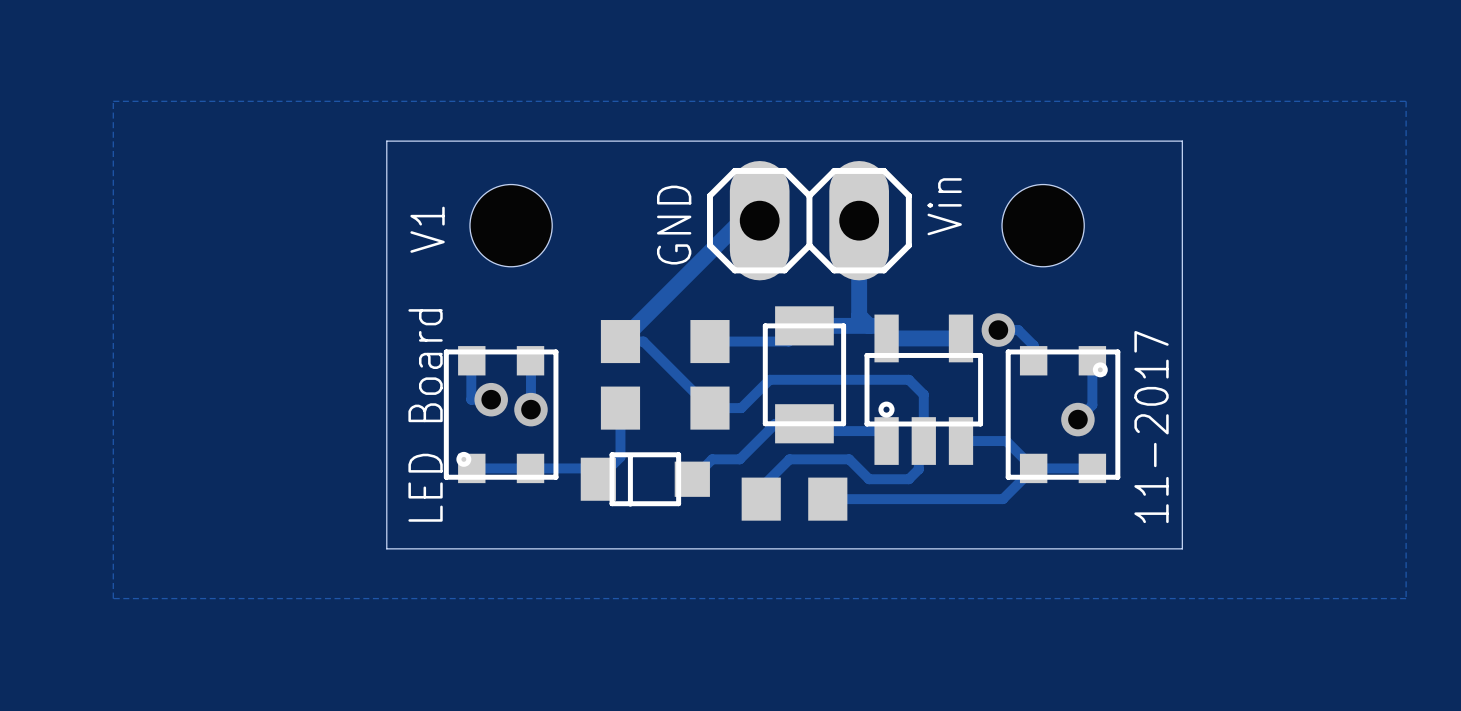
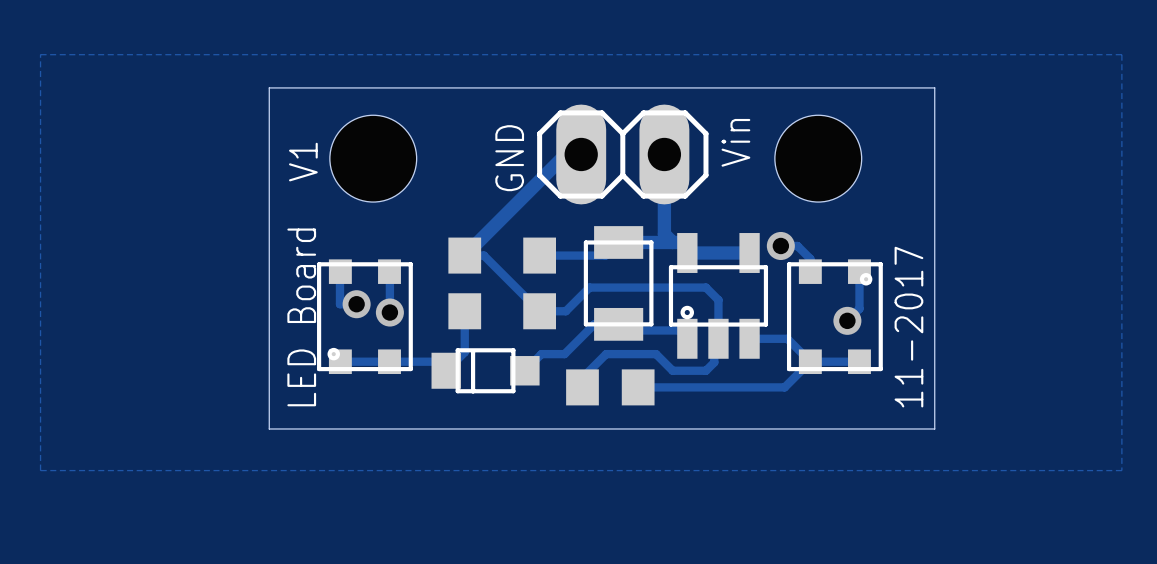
hole size: [469, 184, 553, 267] -> [329, 115, 417, 203]
hole size: [1002, 184, 1085, 267] -> [774, 115, 862, 203]

